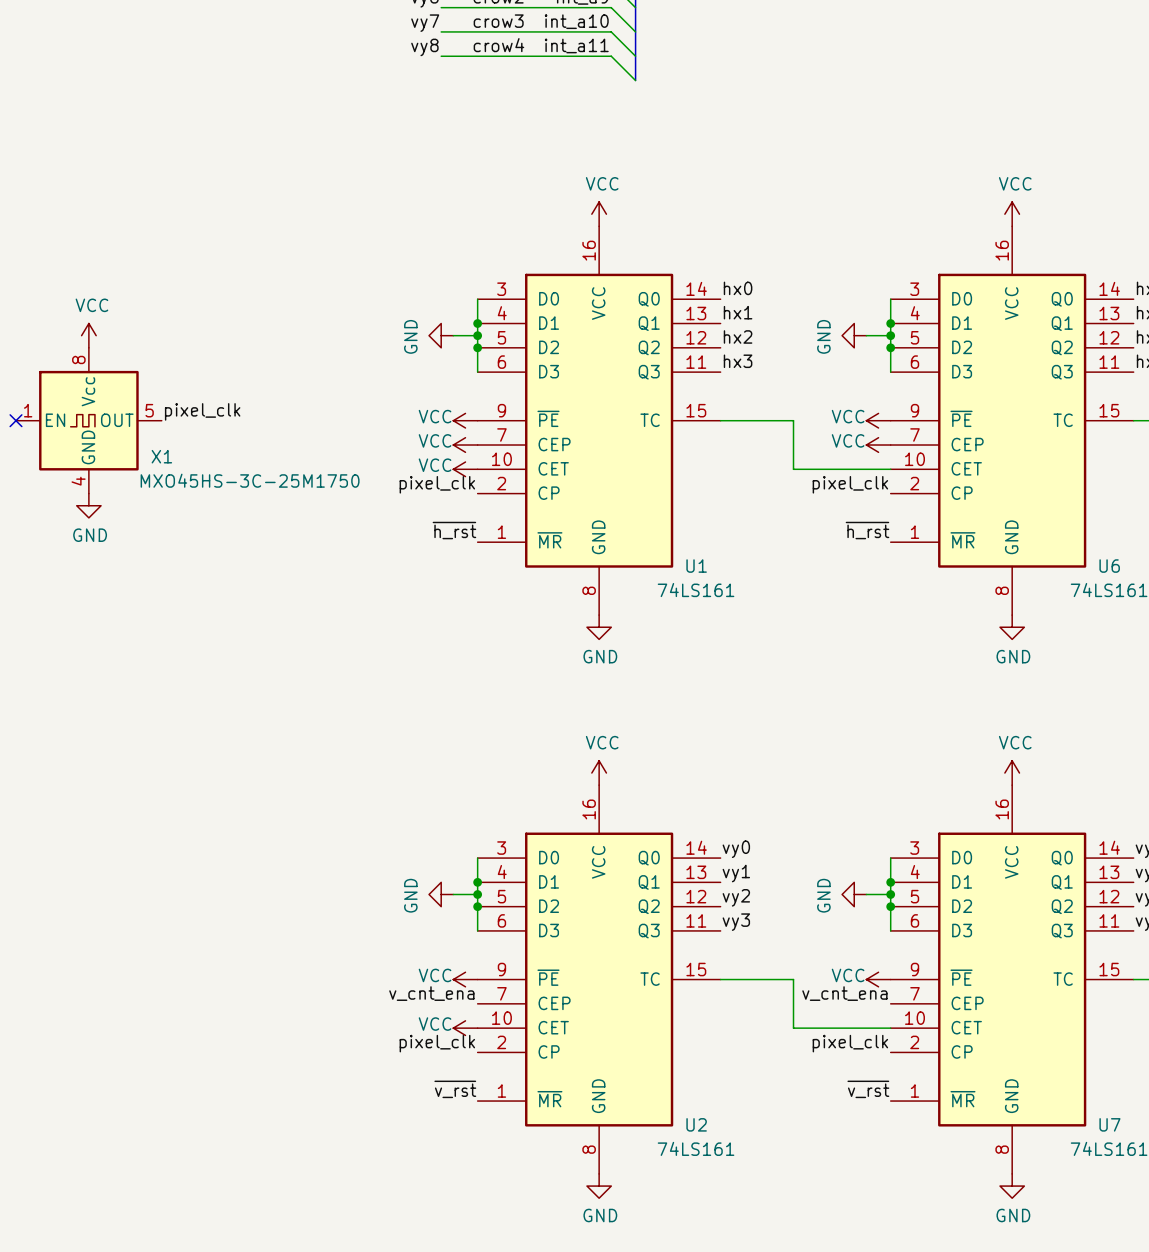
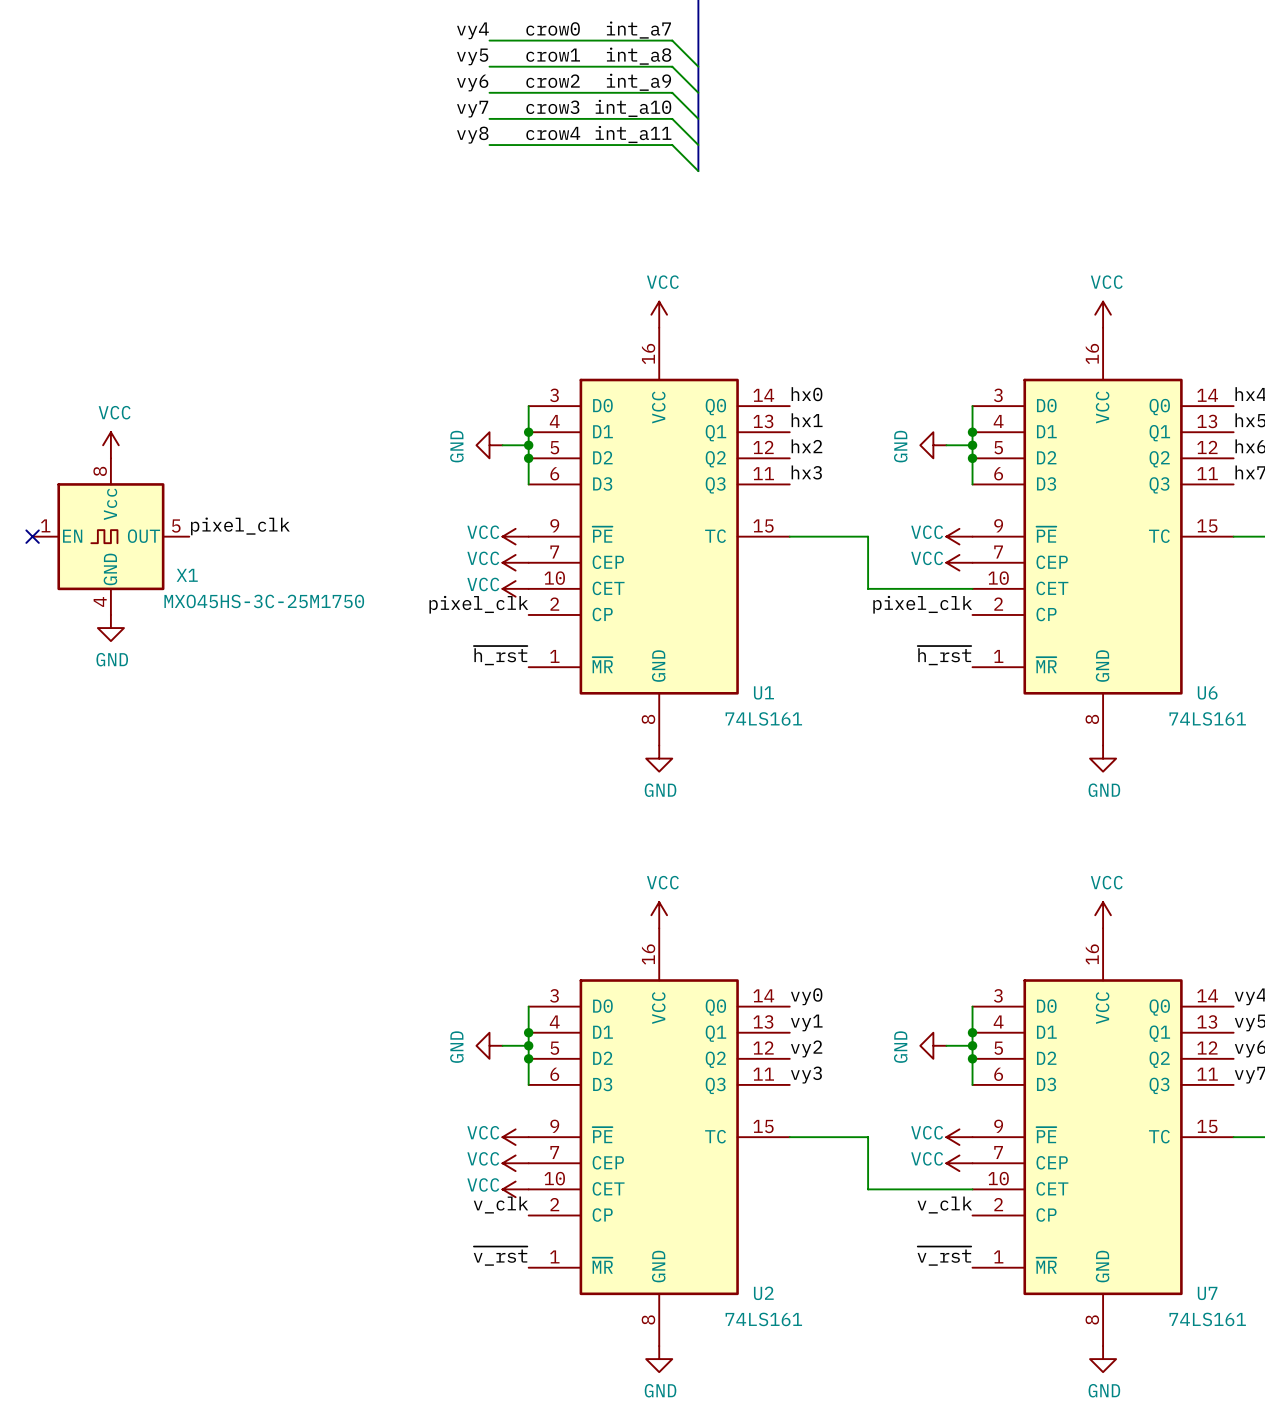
label: v_cnt_ena (431, 993) -> none
label: v_cnt_ena (844, 993) -> none
power symbol: none -> VCC (515, 1163)
power symbol: none -> VCC (959, 1163)
label: pixel_clk (437, 1043) -> v_clk (500, 1205)
label: pixel_clk (850, 1043) -> v_clk (944, 1205)

